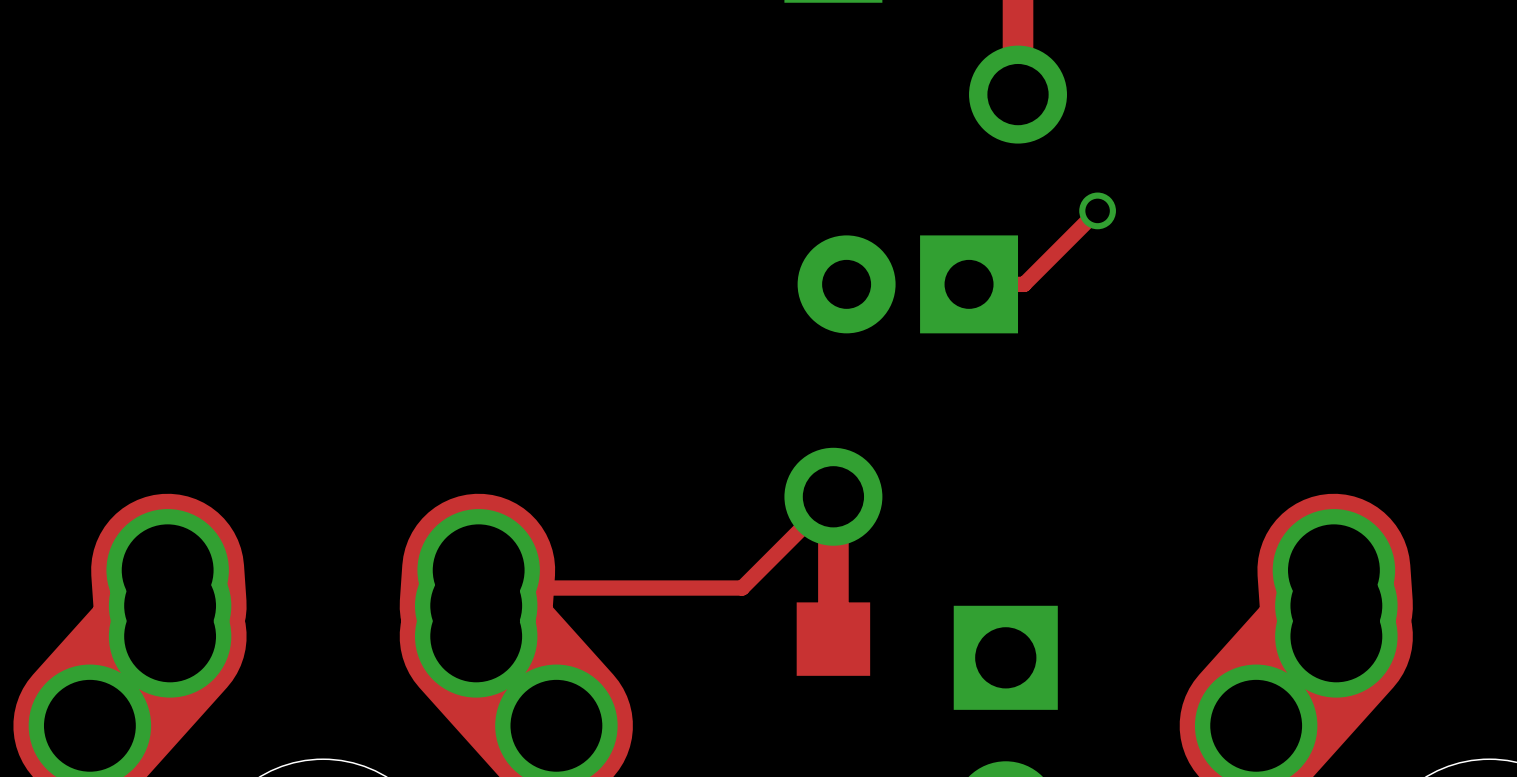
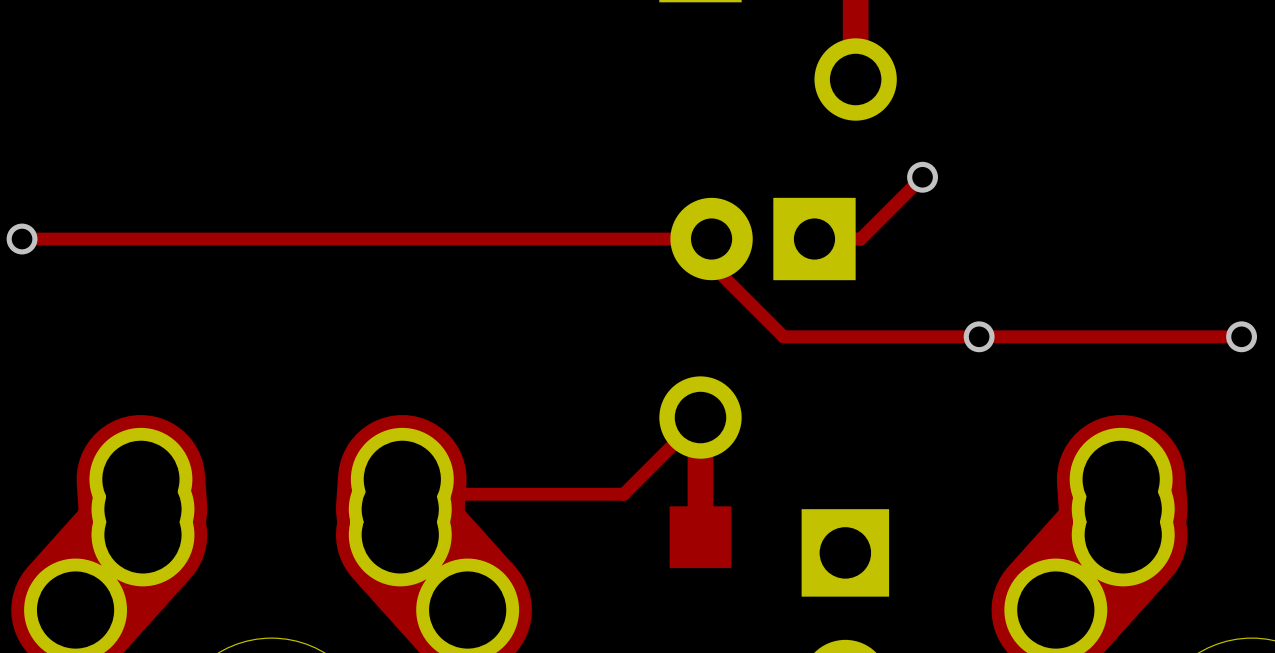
track: none -> (22, 239) (711, 239) (711, 264) (783, 336) (1241, 336)
via: none -> (22, 239)
via: none -> (979, 336)
via: none -> (1241, 336)

